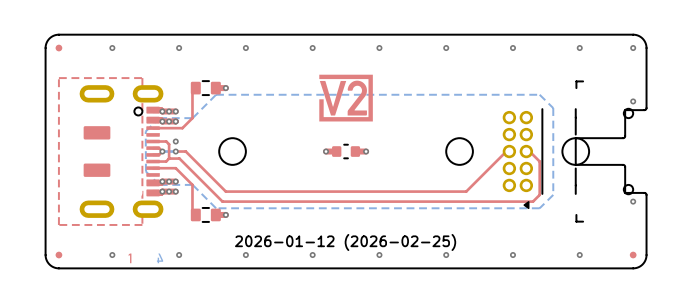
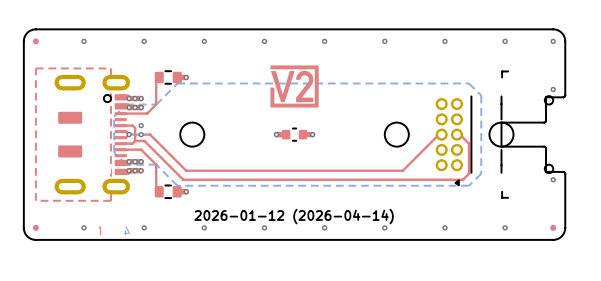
drawing shape: [235, 234, 456, 251] -> [194, 209, 394, 225]

